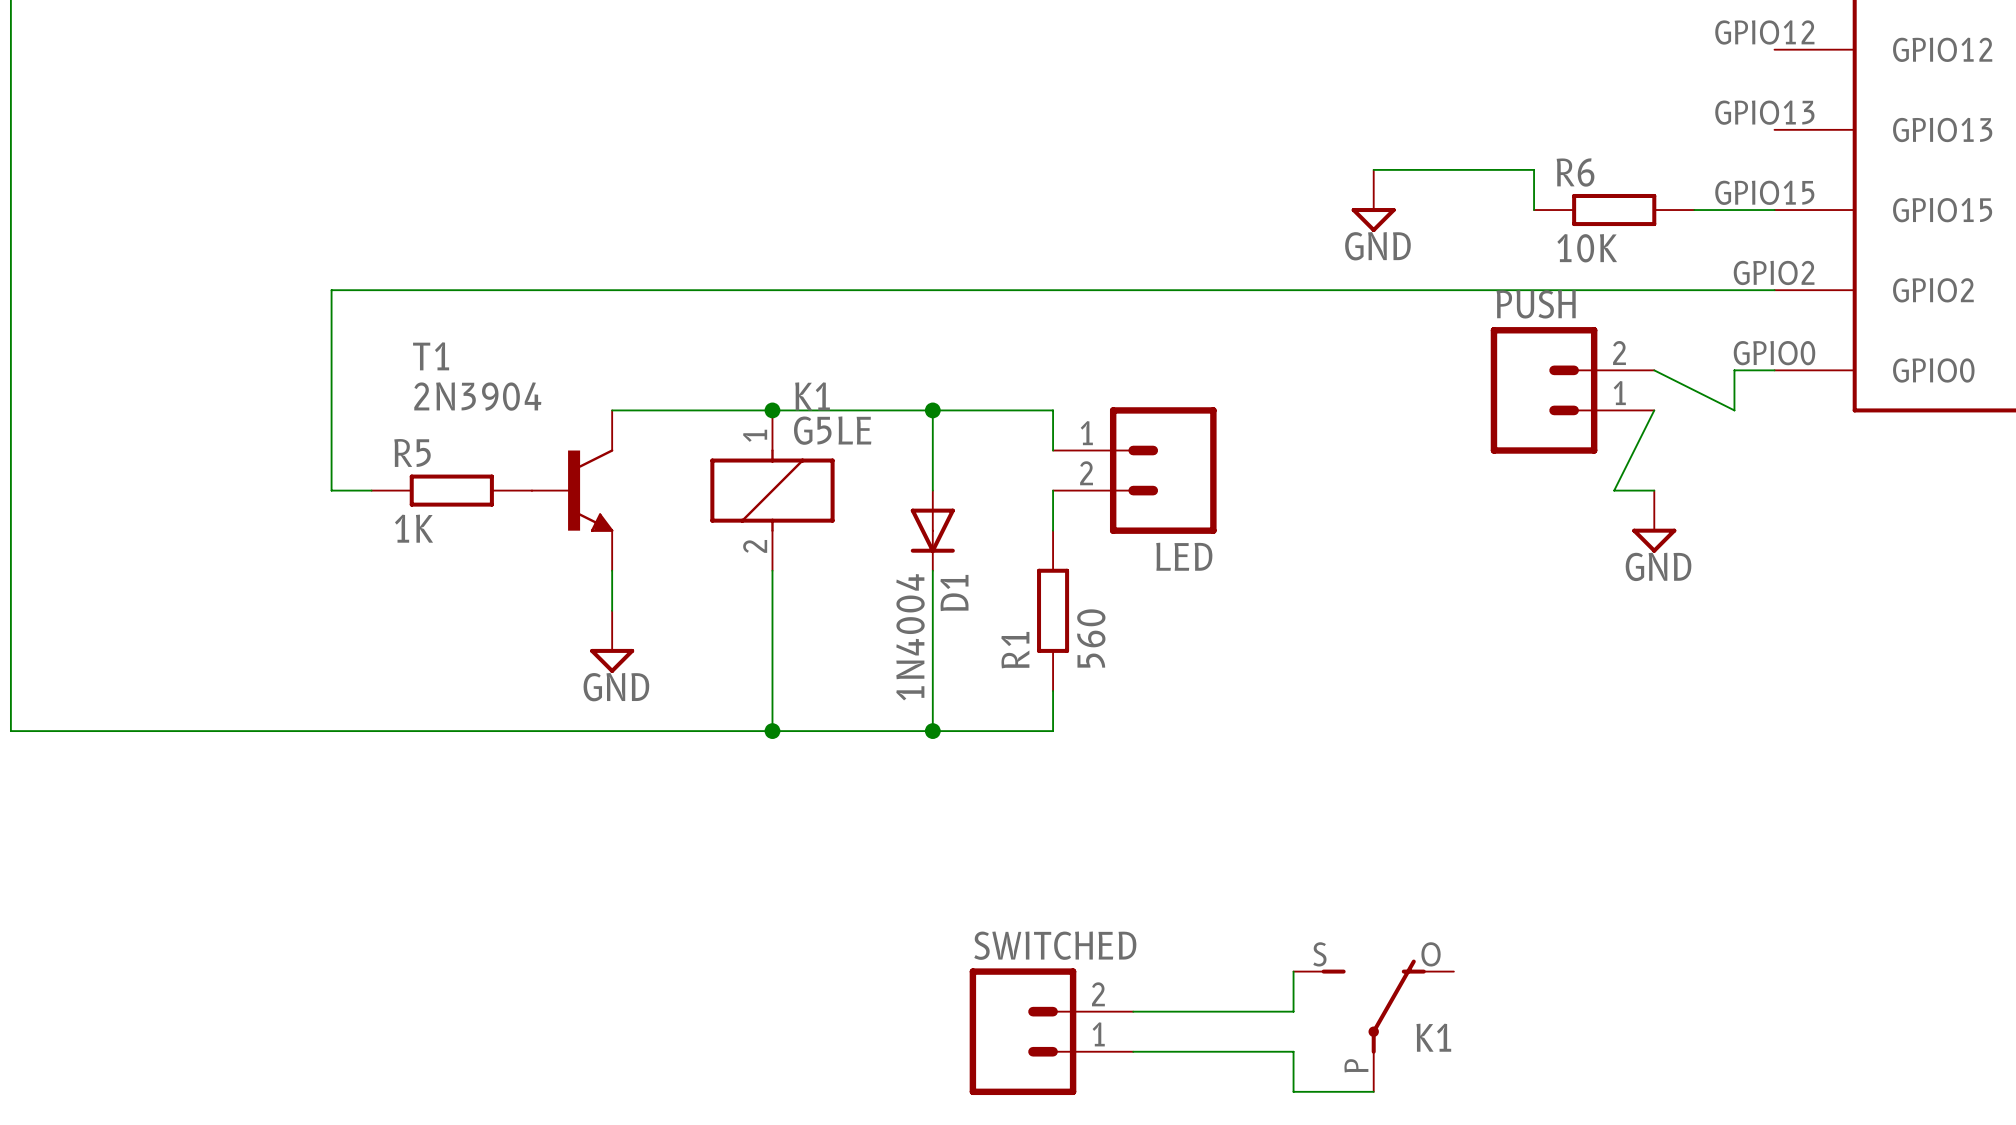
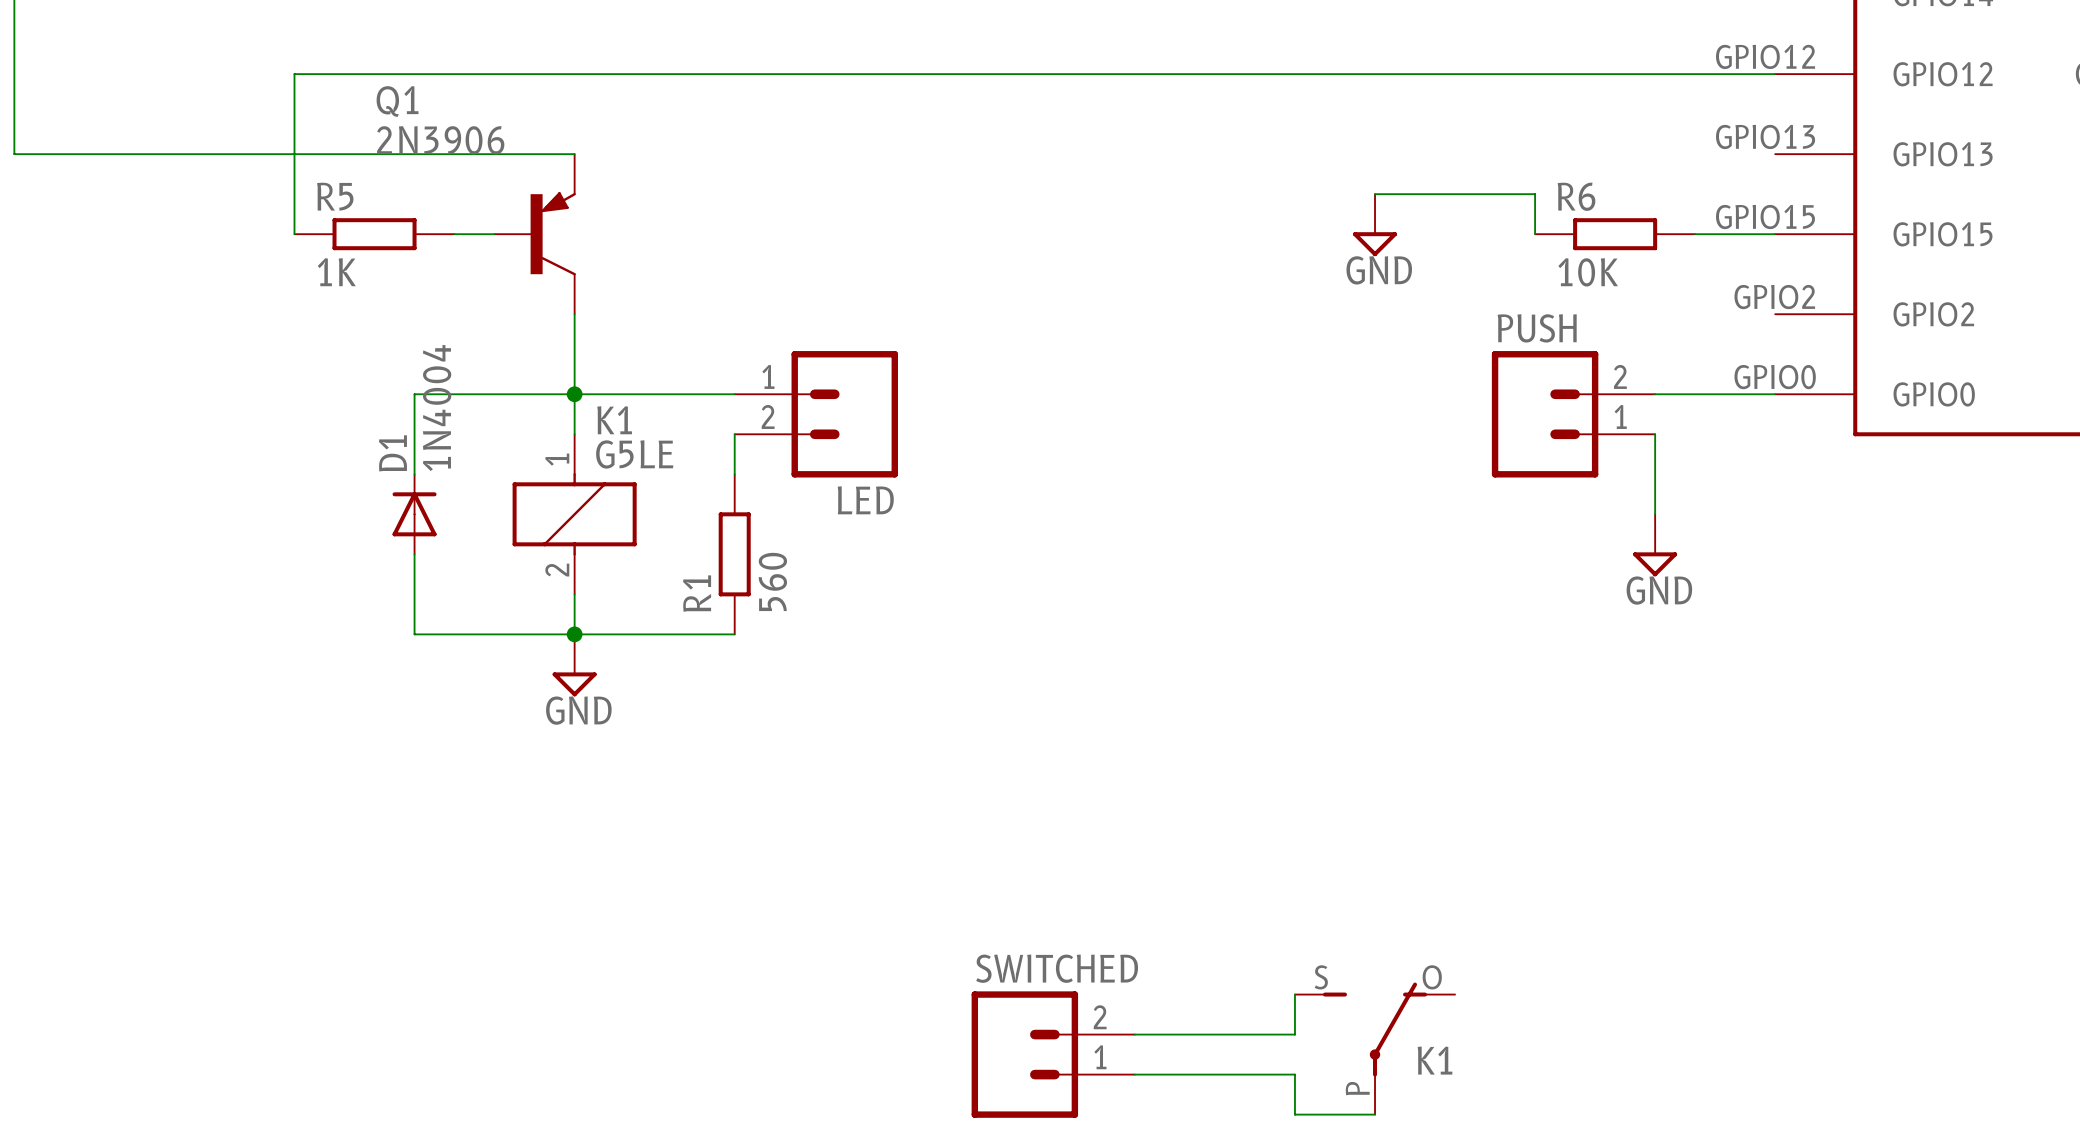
wire: none -> (1775, 74) (294, 74) (294, 234)
wire: (10, 129) (10, 731) (1053, 731) (1053, 691) -> (14, 154) (574, 154)
wire: none -> (454, 234) (494, 234)
Q1: none -> 2N3906 (535, 234)
wire: none -> (574, 314) (574, 434)
wire: (1774, 290) (331, 290) (331, 490) (371, 490) -> none
junction: none -> (574, 394)
wire: none -> (734, 394) (414, 394) (414, 474)
wire: (1654, 370) (1734, 410) (1734, 370) -> (1655, 394) (1735, 394)
wire: (612, 410) (1053, 410) (1053, 450) -> none
junction: (772, 410) -> none
wire: (932, 410) (932, 490) -> none
junction: (932, 410) -> none
wire: (1654, 410) (1614, 490) (1654, 490) -> (1655, 434) (1655, 514)
LED position: (1134, 470) -> (816, 414)
R5 position: (451, 490) -> (374, 234)
T1: 2N3904 (572, 490) -> none
K1 position: (772, 490) -> (574, 514)
wire: (1053, 490) (1053, 530) -> (734, 434) (734, 474)
wire: none -> (414, 554) (414, 634) (734, 634)
D1 rotation: 0° (932, 530) -> 180° (414, 514)
D1 position: (932, 530) -> (414, 514)
wire: (612, 570) (612, 610) -> (574, 594) (574, 634)
wire: (772, 570) (772, 731) -> none
wire: (932, 570) (932, 731) -> none
junction: none -> (574, 634)
R1 position: (1053, 610) -> (734, 554)
power symbol position: GND (612, 641) -> GND (574, 665)
junction: (772, 731) -> none
junction: (932, 731) -> none

